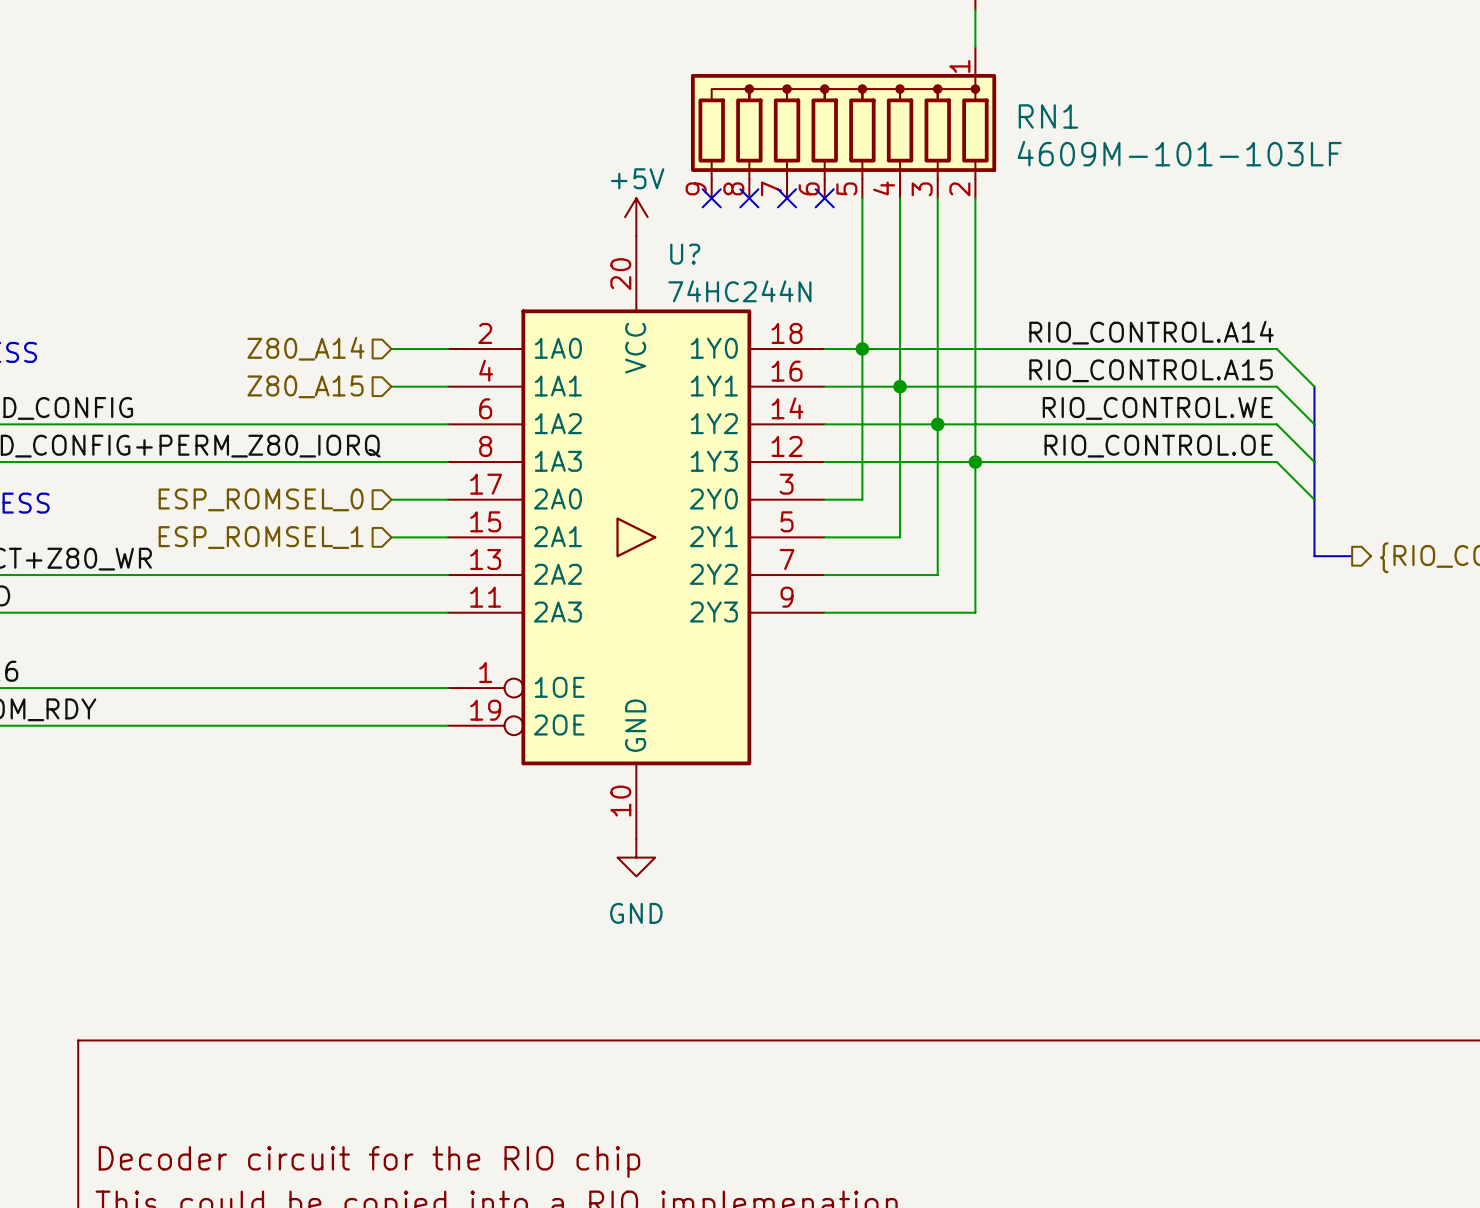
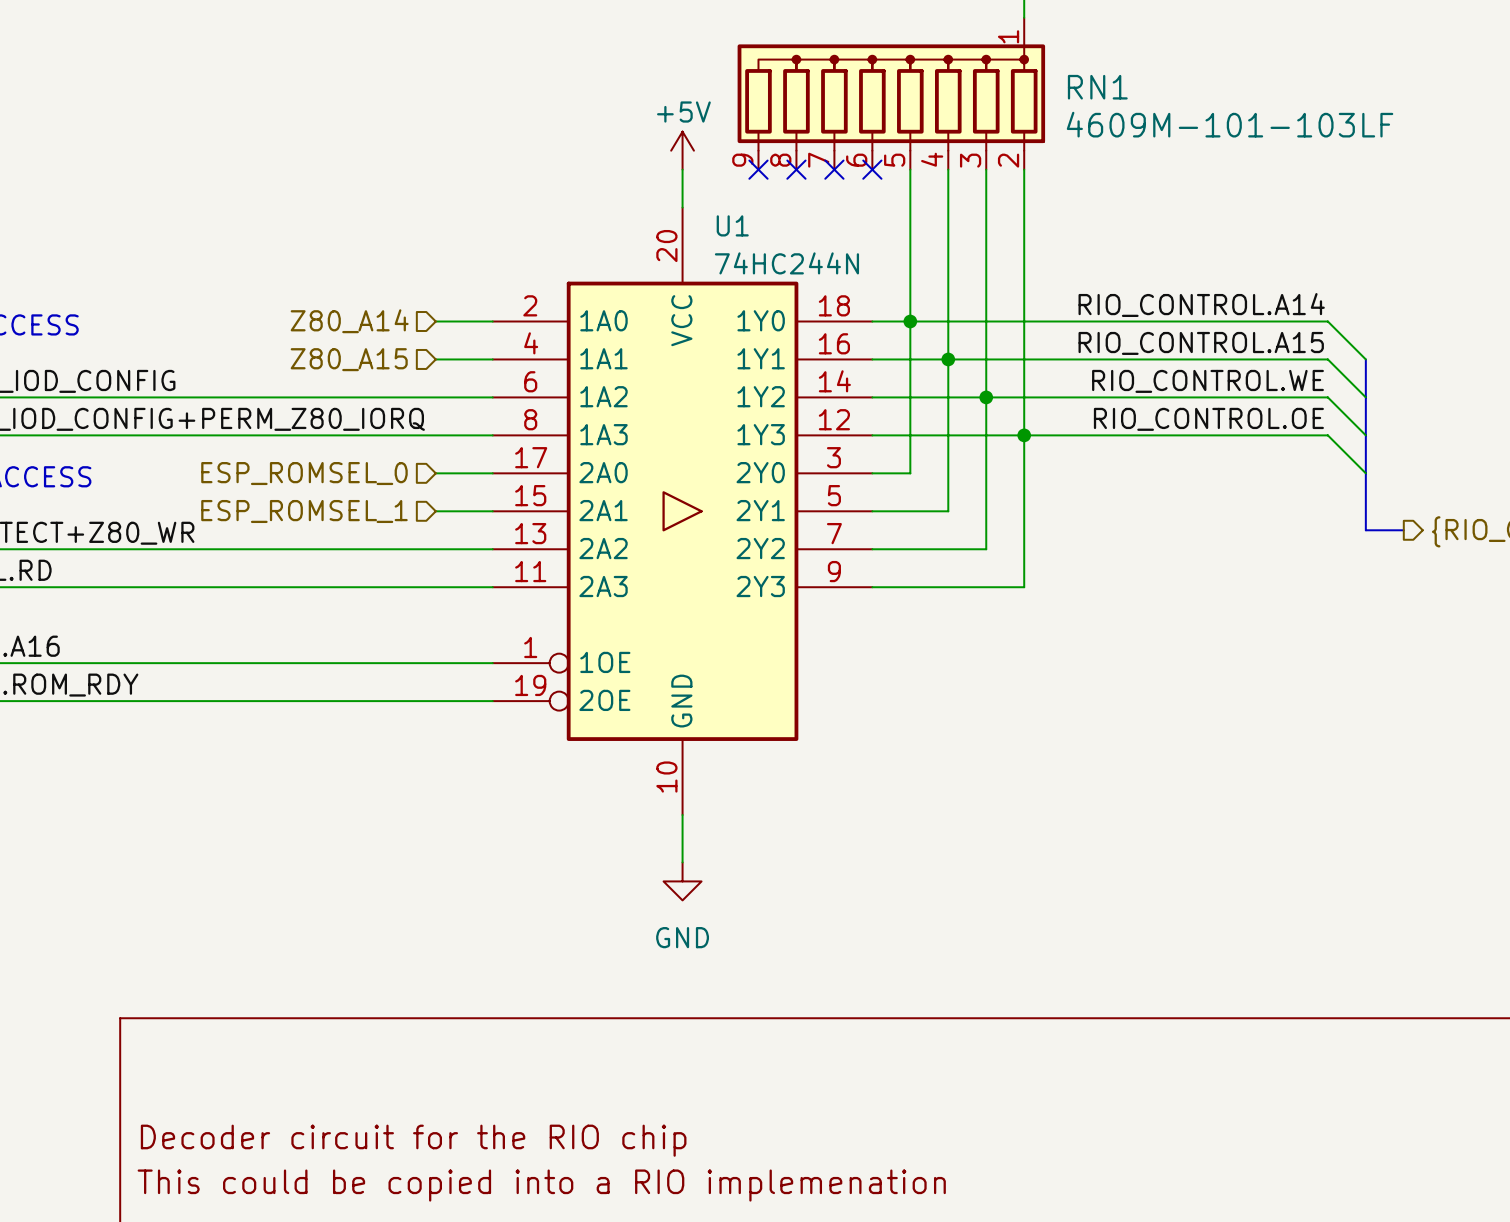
power symbol position: +5V (636, 217) -> +5V (682, 150)
U? name: U? (685, 254) -> U1 (732, 225)
wire: none -> (682, 814) (682, 862)
power symbol position: GND (636, 857) -> GND (682, 881)

